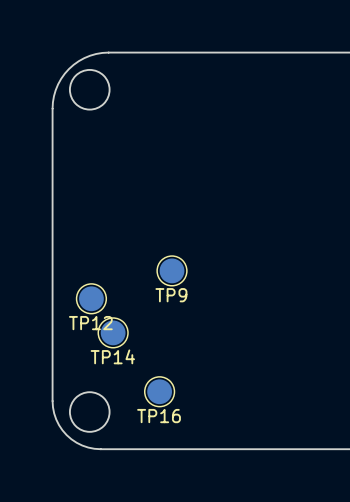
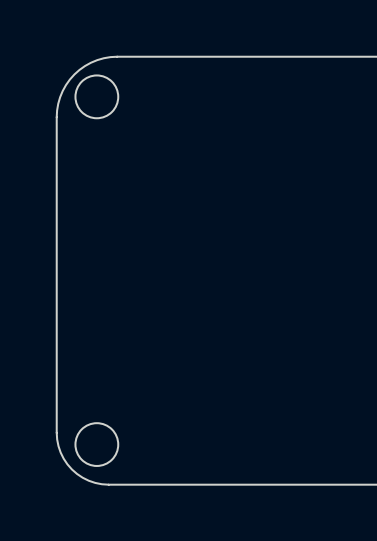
TP9: (172, 270) -> none
TP12: (91, 298) -> none
TP14: (113, 332) -> none
TP16: (159, 391) -> none

